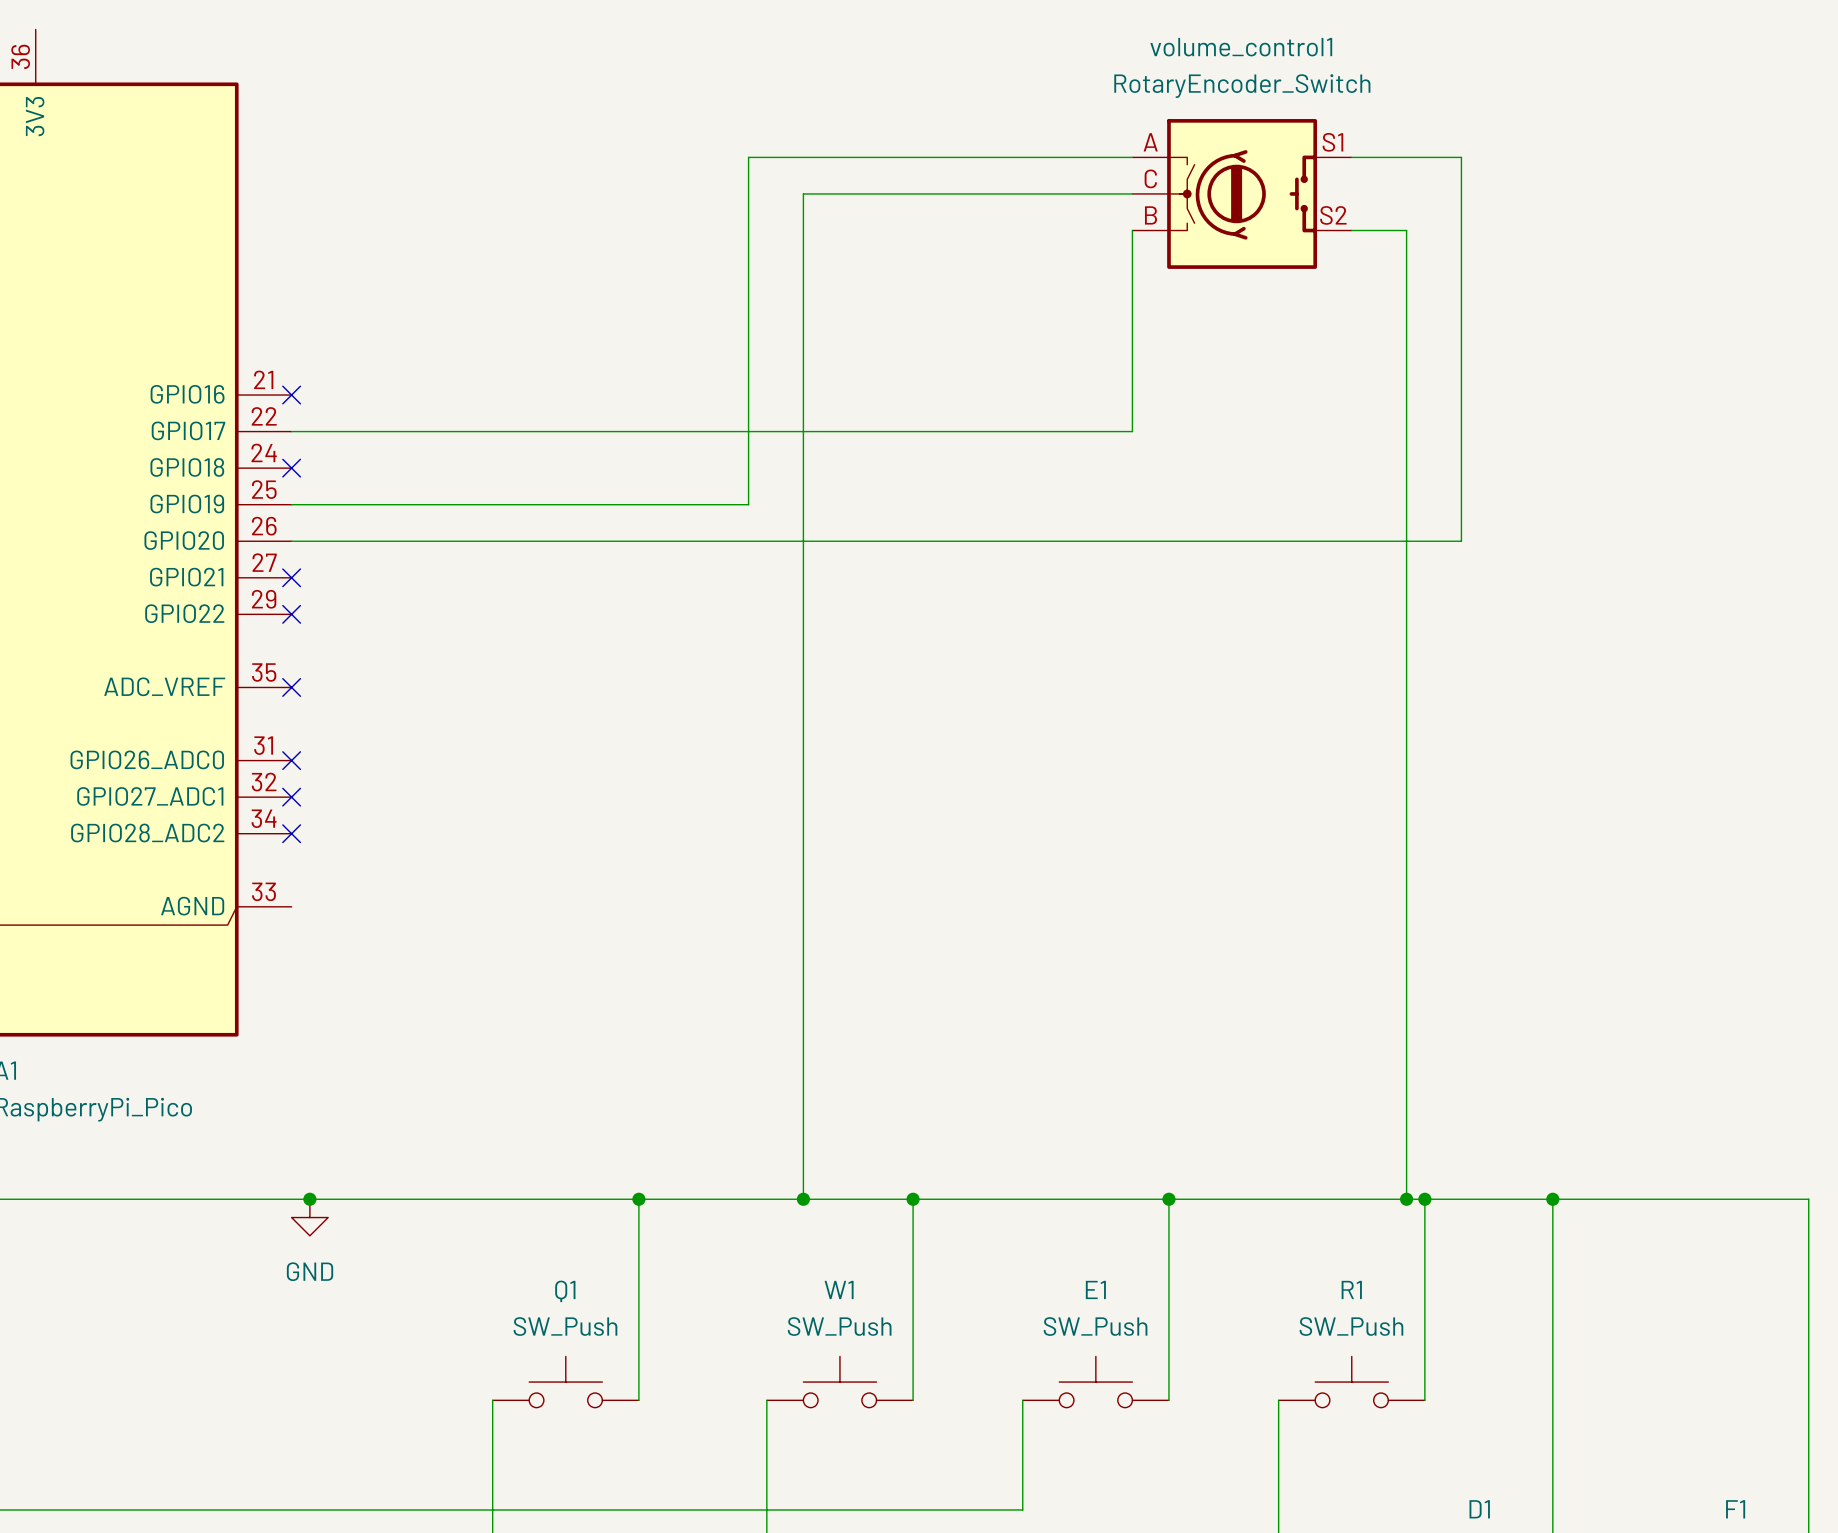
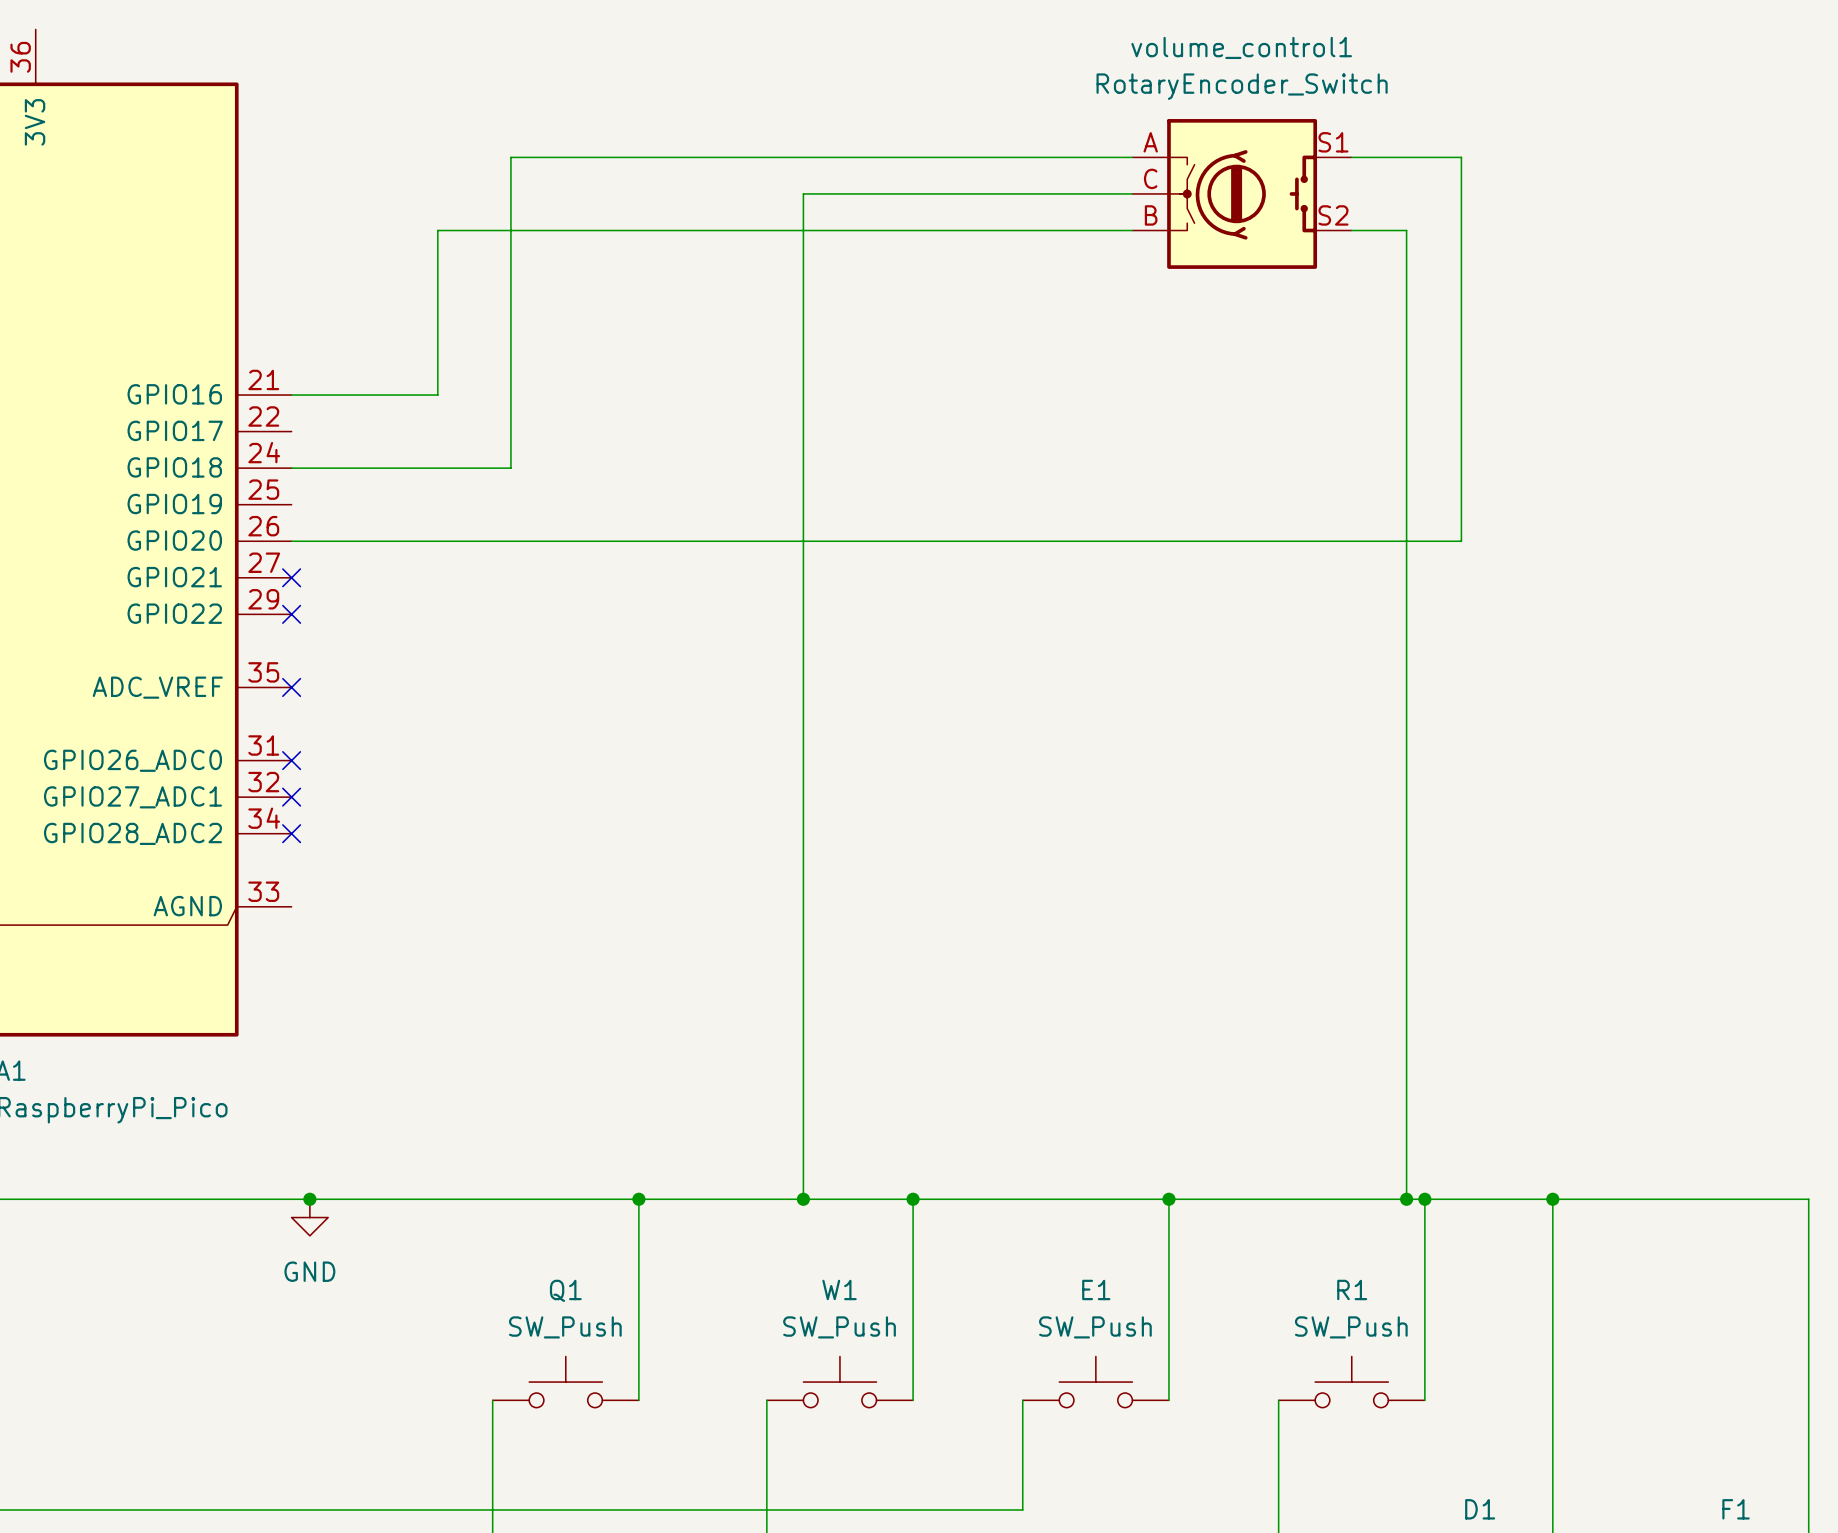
wire: (748, 157) (748, 504) (291, 504) -> (748, 157) (510, 157) (510, 468) (291, 468)
wire: (1132, 230) (1132, 431) (291, 431) -> (1132, 230) (437, 230) (437, 395) (291, 395)
no-connect mark: (291, 395) -> none
no-connect mark: (291, 468) -> none

